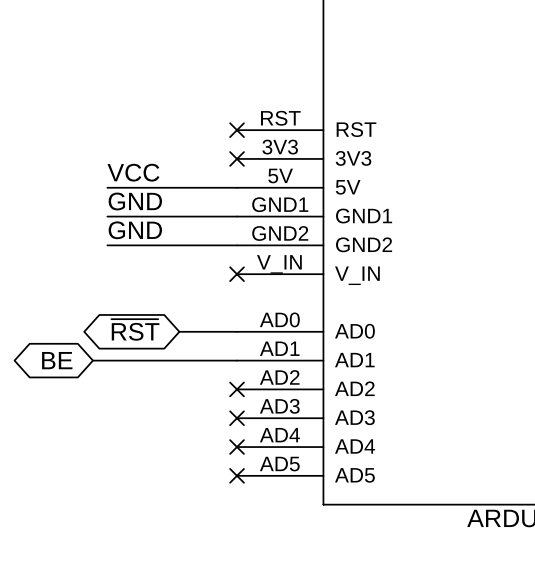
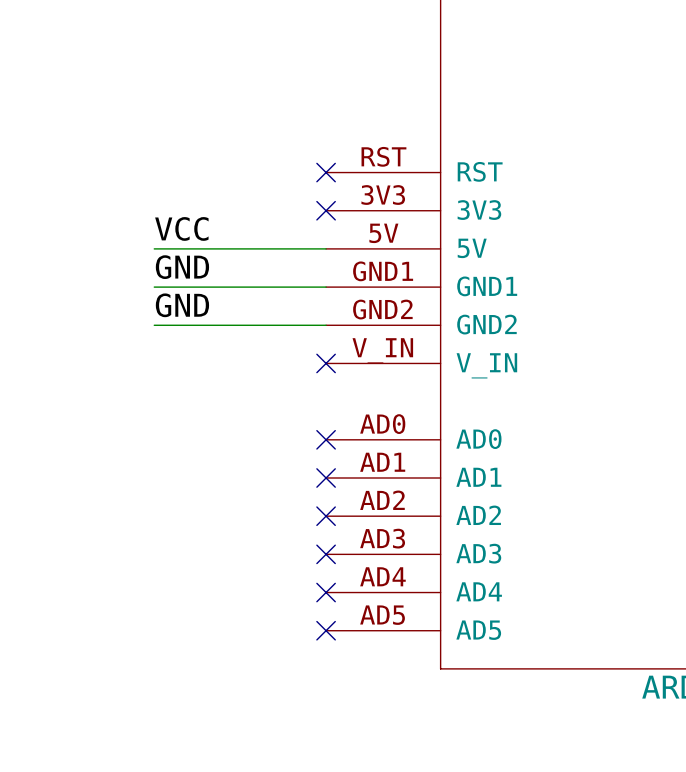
global label: ~{RST} (135, 329) -> none
wire: (179, 331) (237, 331) -> none
no-connect mark: none -> (326, 439)
global label: BE (57, 360) -> none
wire: (92, 360) (237, 360) -> none
no-connect mark: none -> (326, 478)

